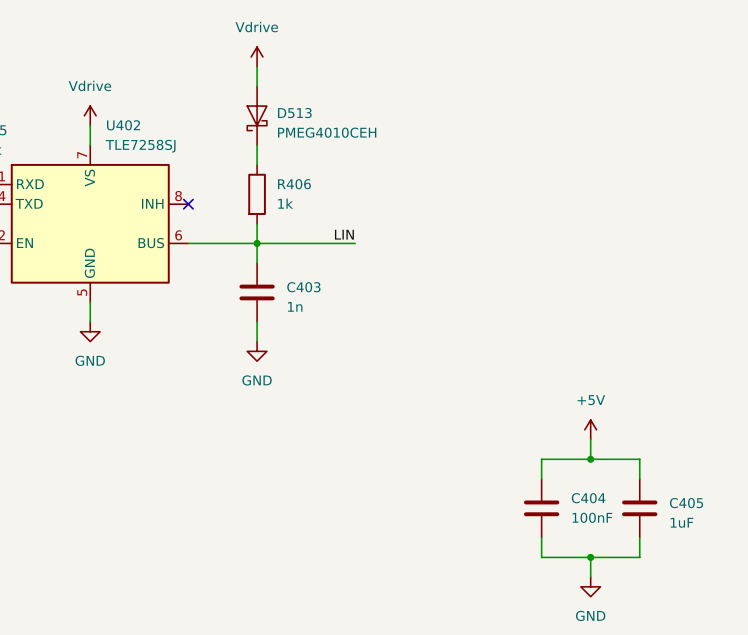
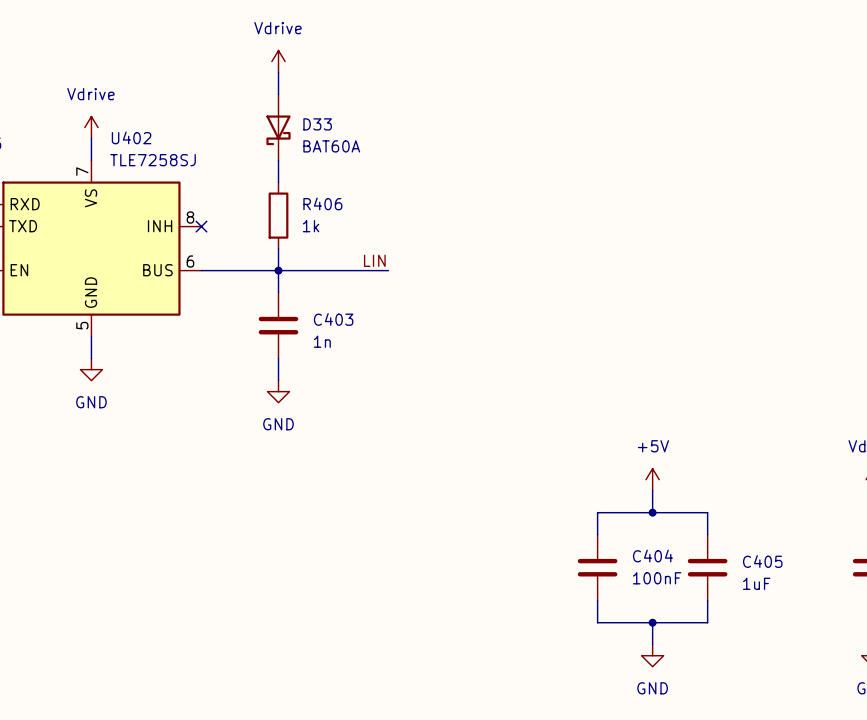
D513: PMEG4010CEH (257, 115) -> none
D33: none -> BAT60A (278, 127)

